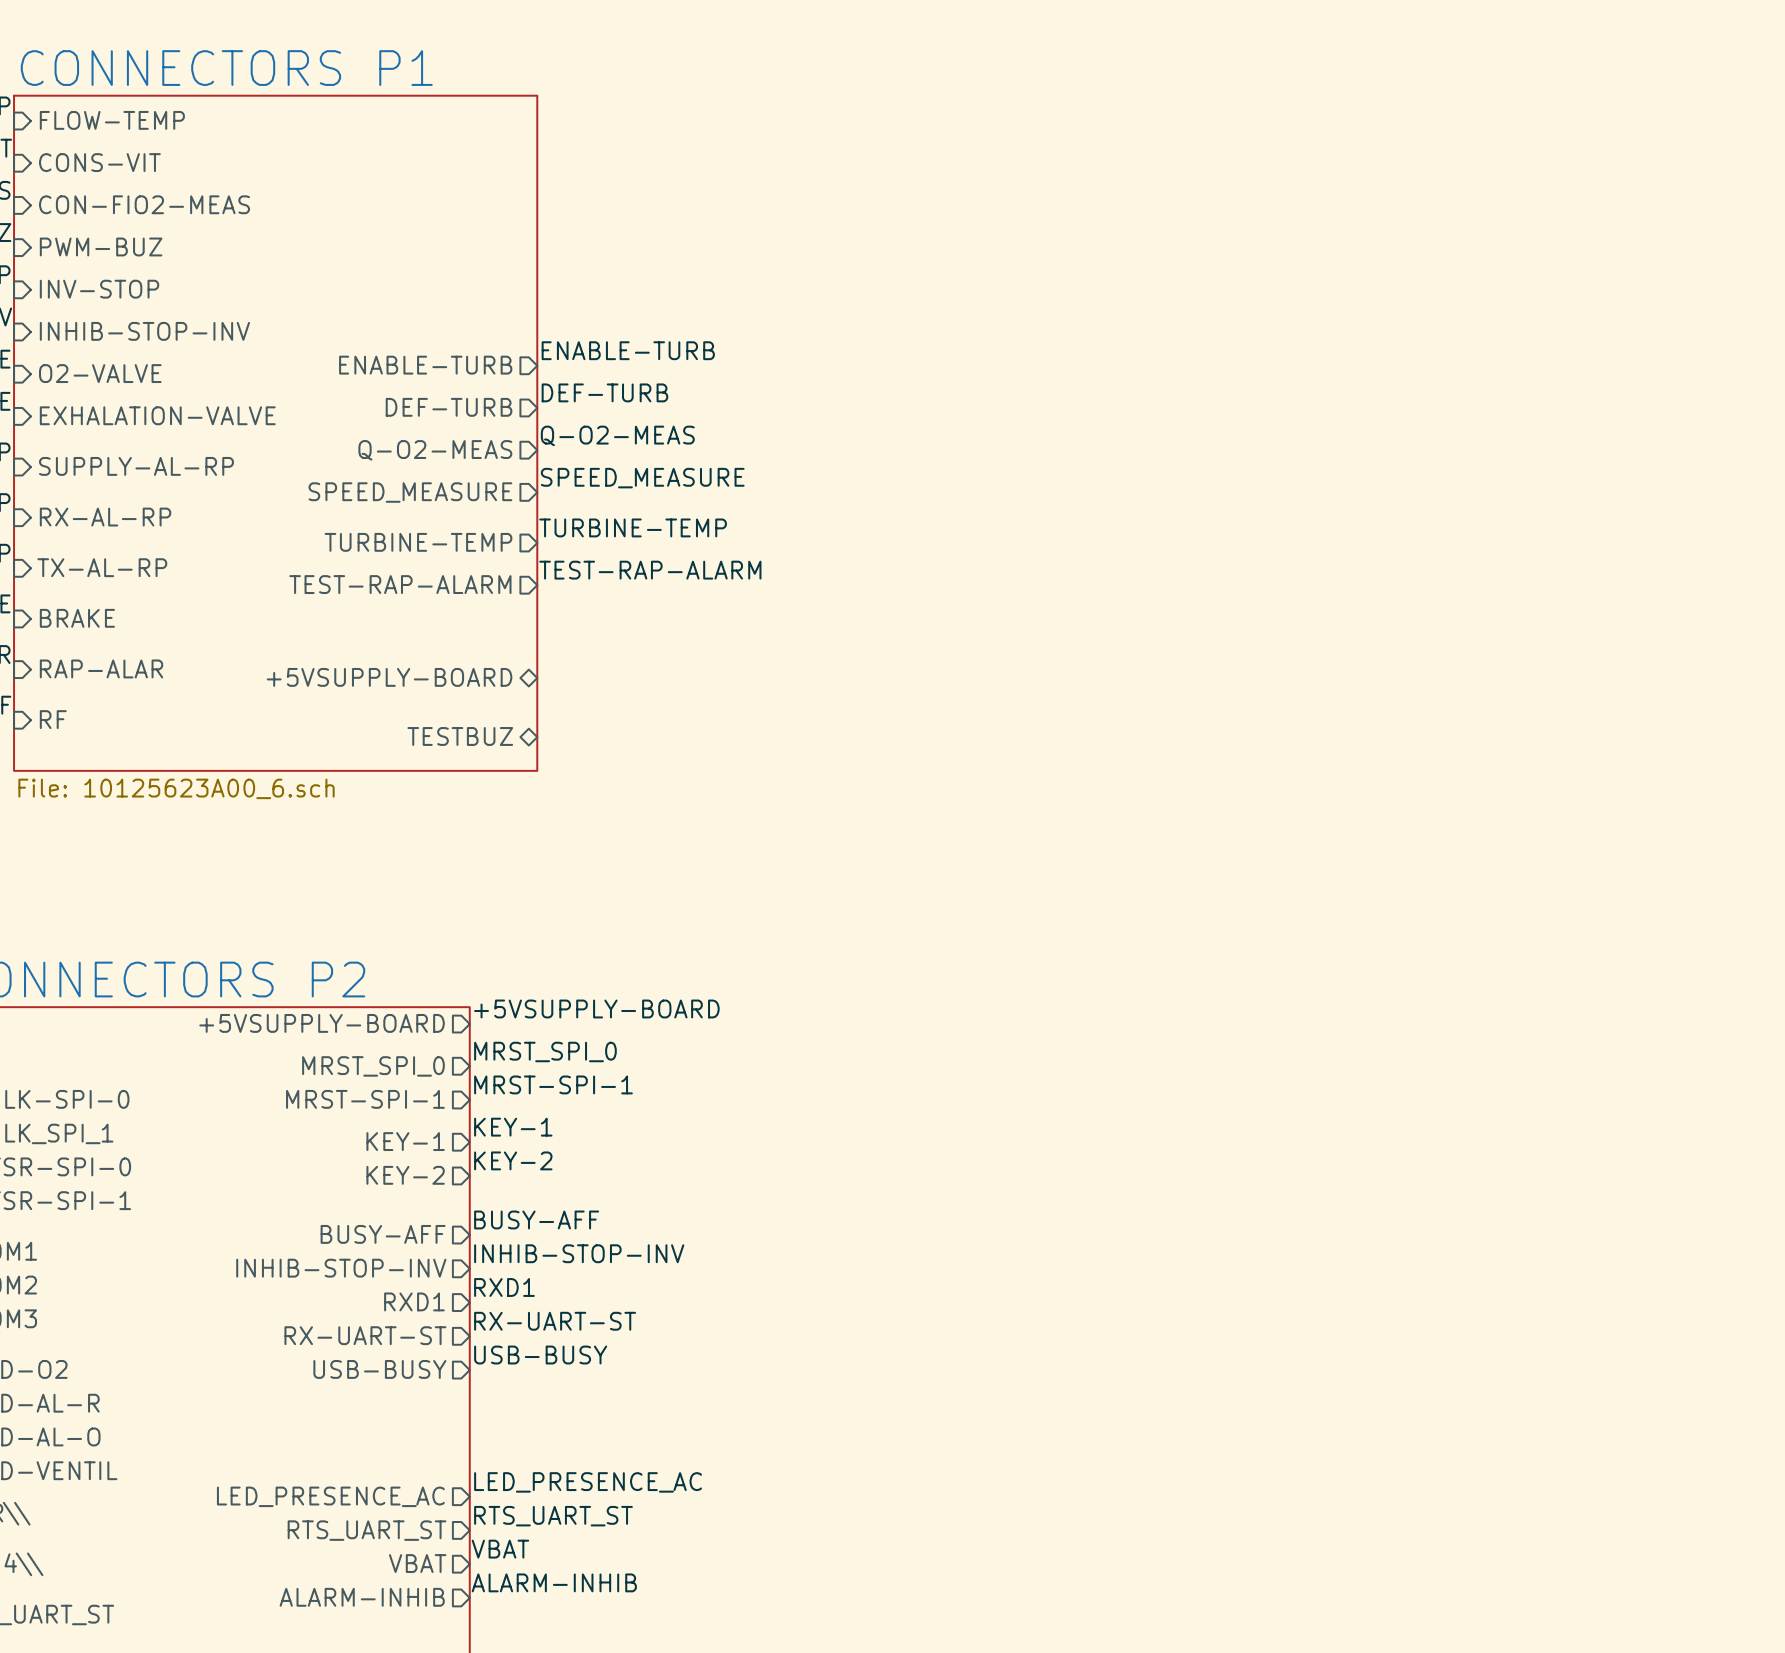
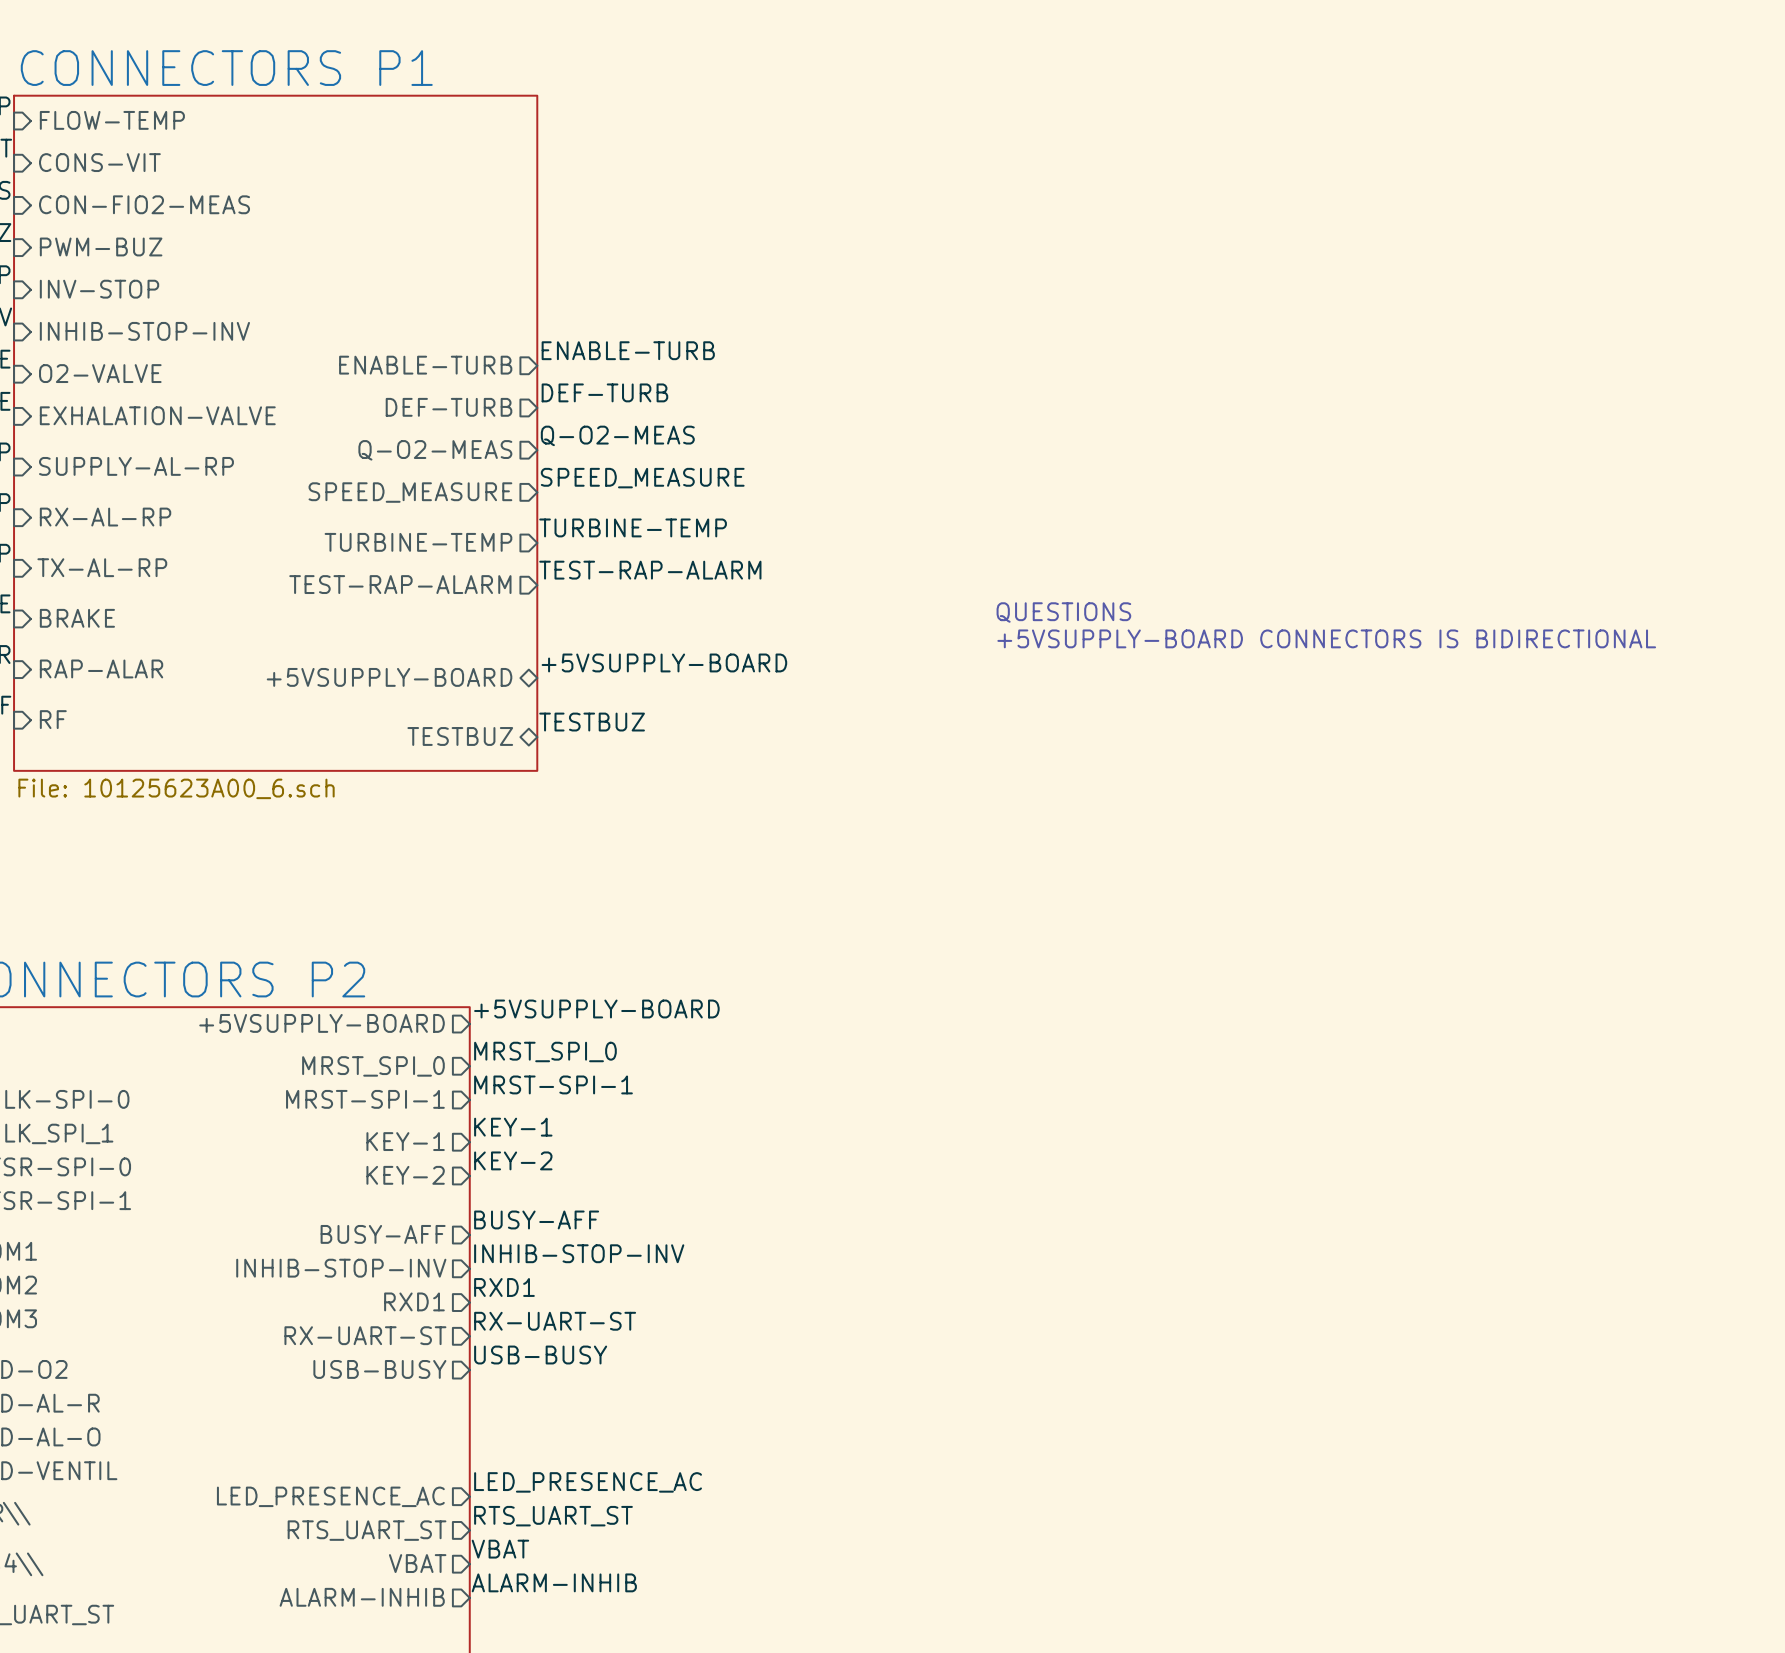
text: none -> QUESTIONS (1063, 612)
text: none -> +5VSUPPLY-BOARD CONNECTORS IS BIDIRECTIONAL (1326, 638)
label: none -> +5VSUPPLY-BOARD (664, 662)
label: none -> TESTBUZ (592, 722)

